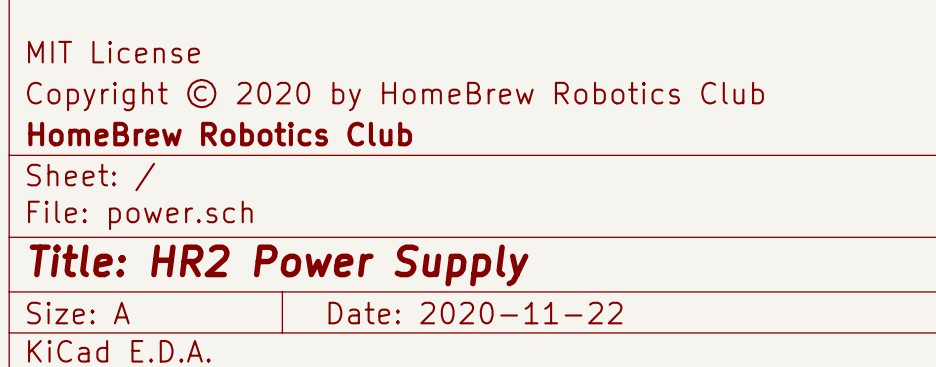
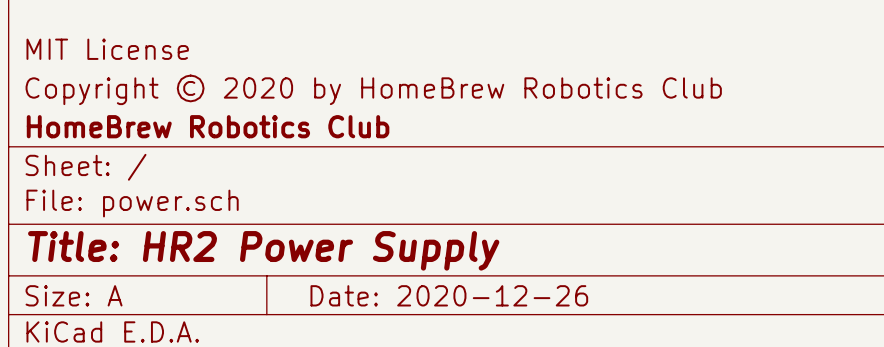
title block: Date: 2020-11-22 (475, 313) -> Date: 2020-12-26 (449, 295)

